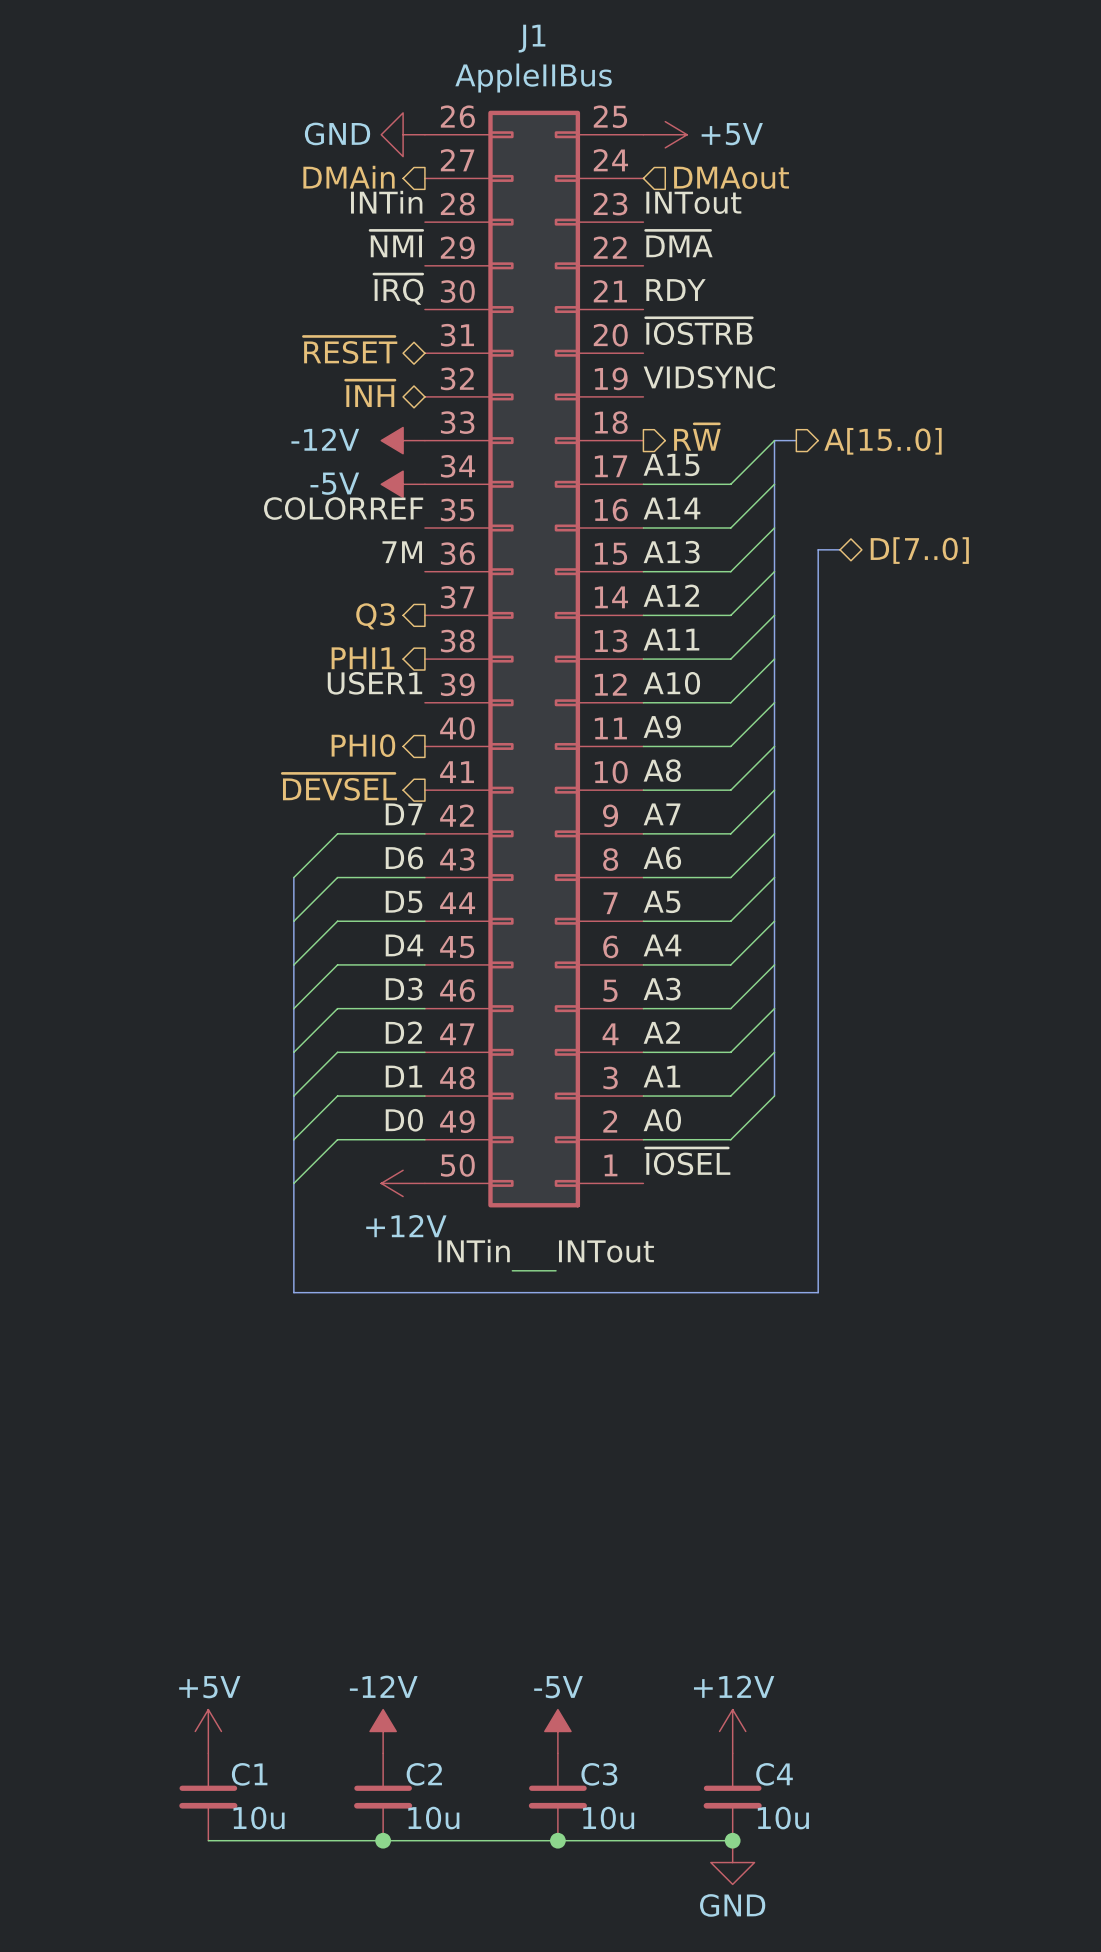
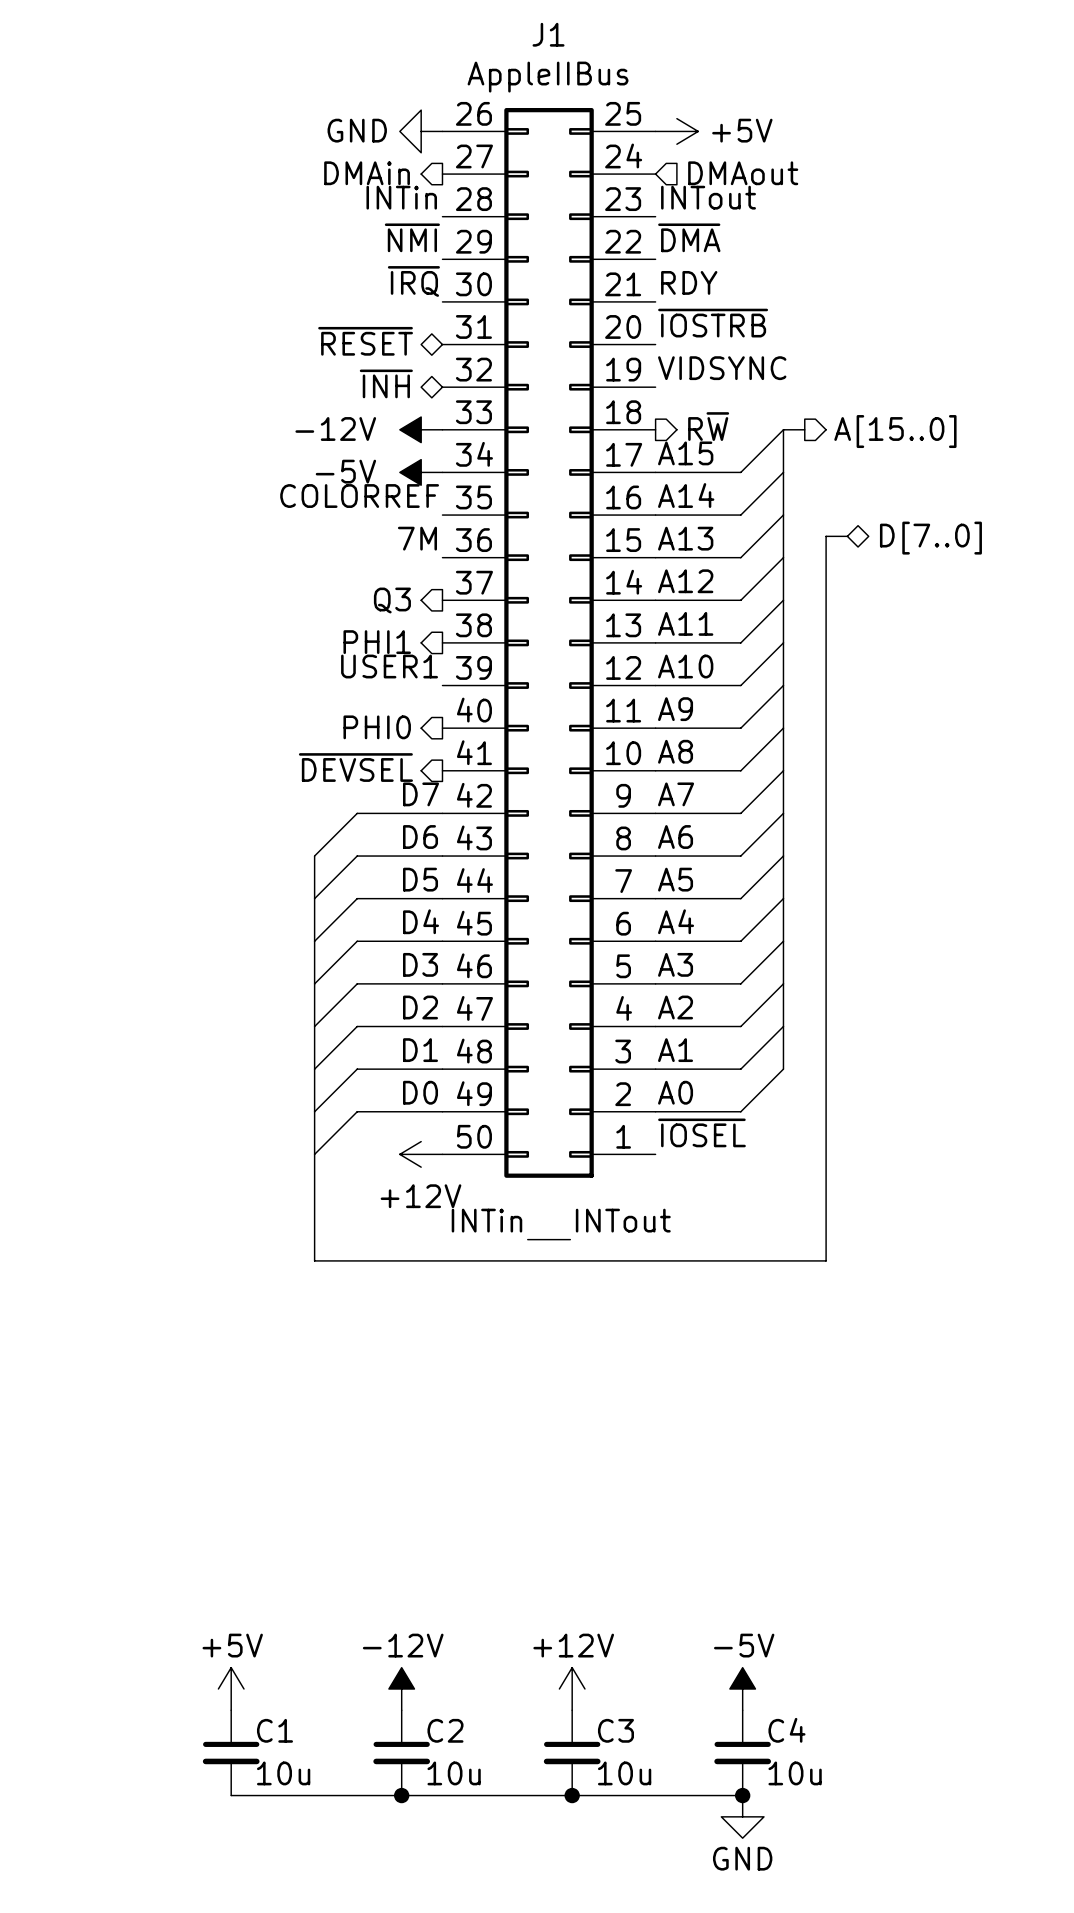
power symbol: -5V (557, 1731) -> +12V (572, 1688)
power symbol: +12V (732, 1731) -> -5V (742, 1688)

